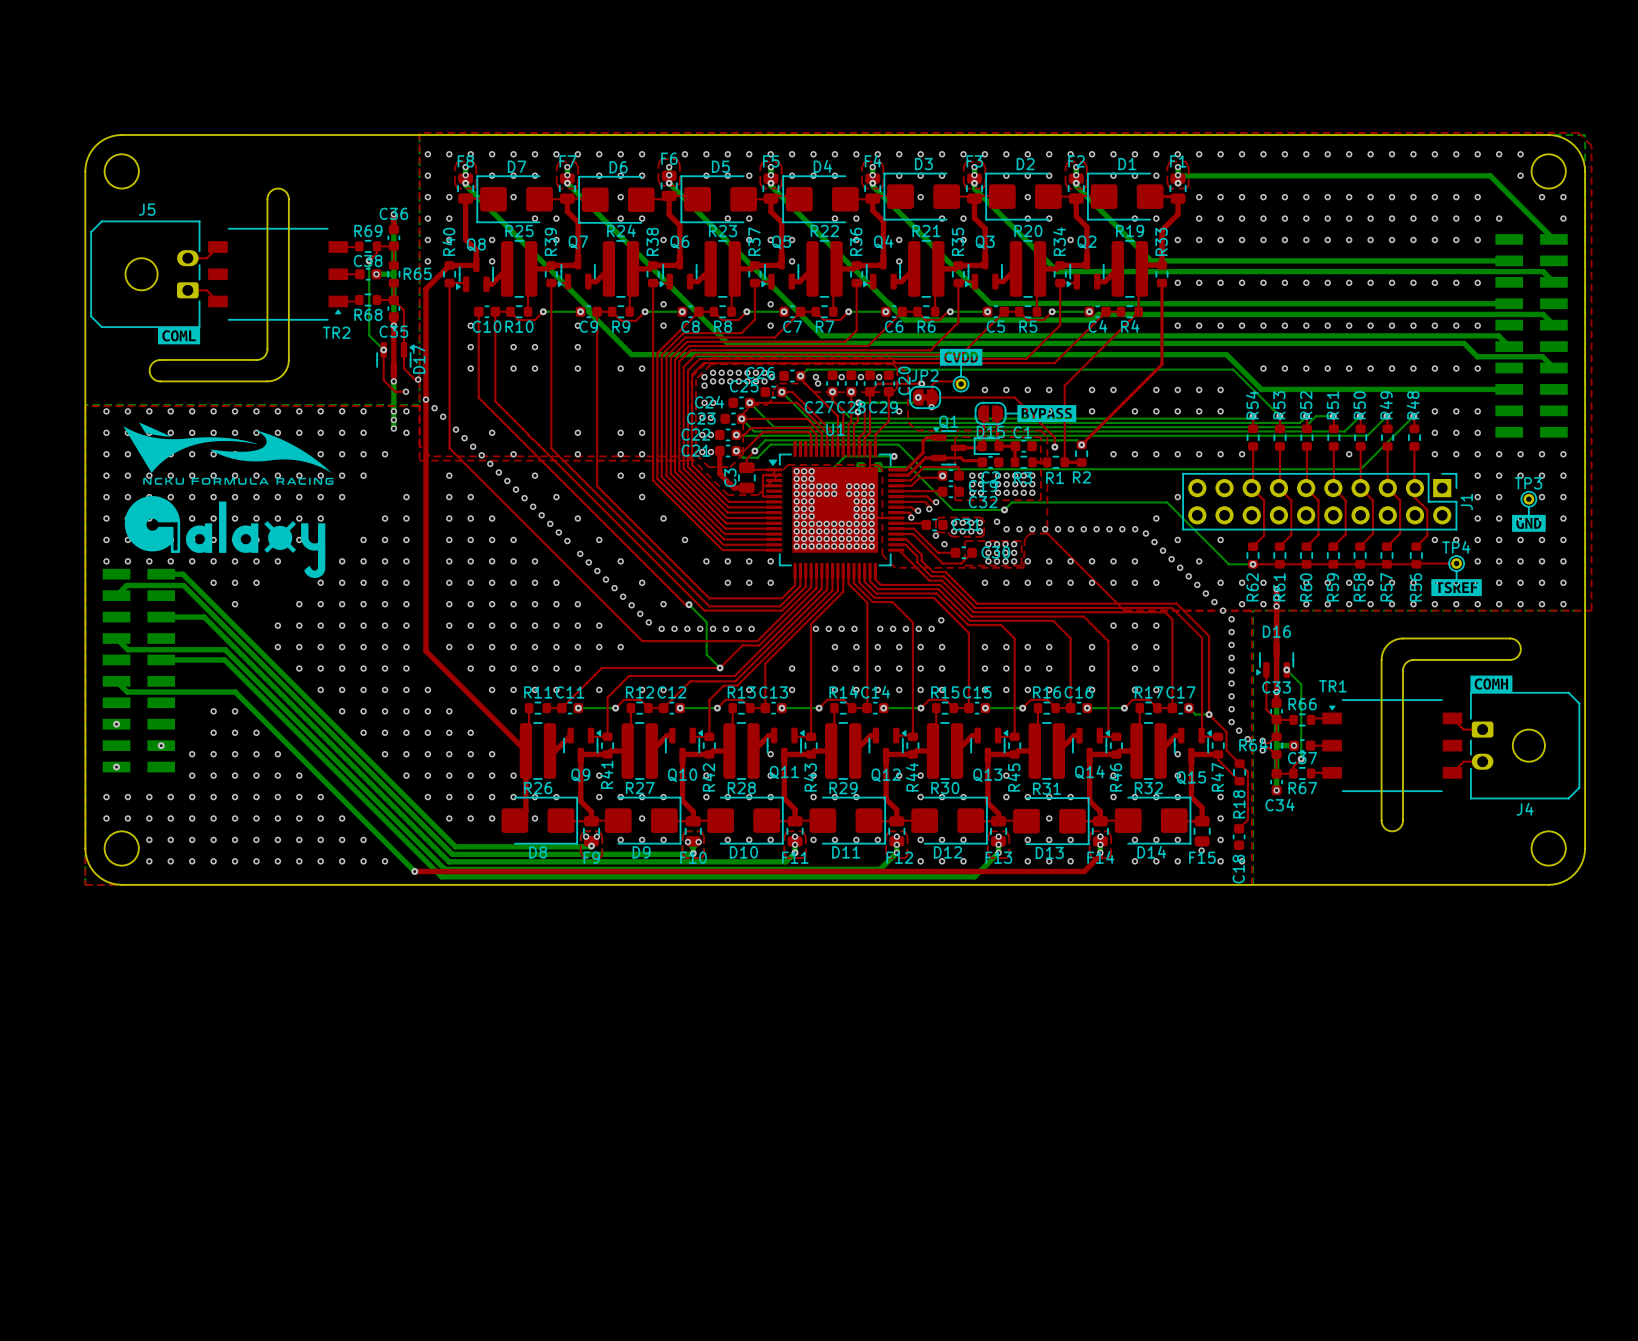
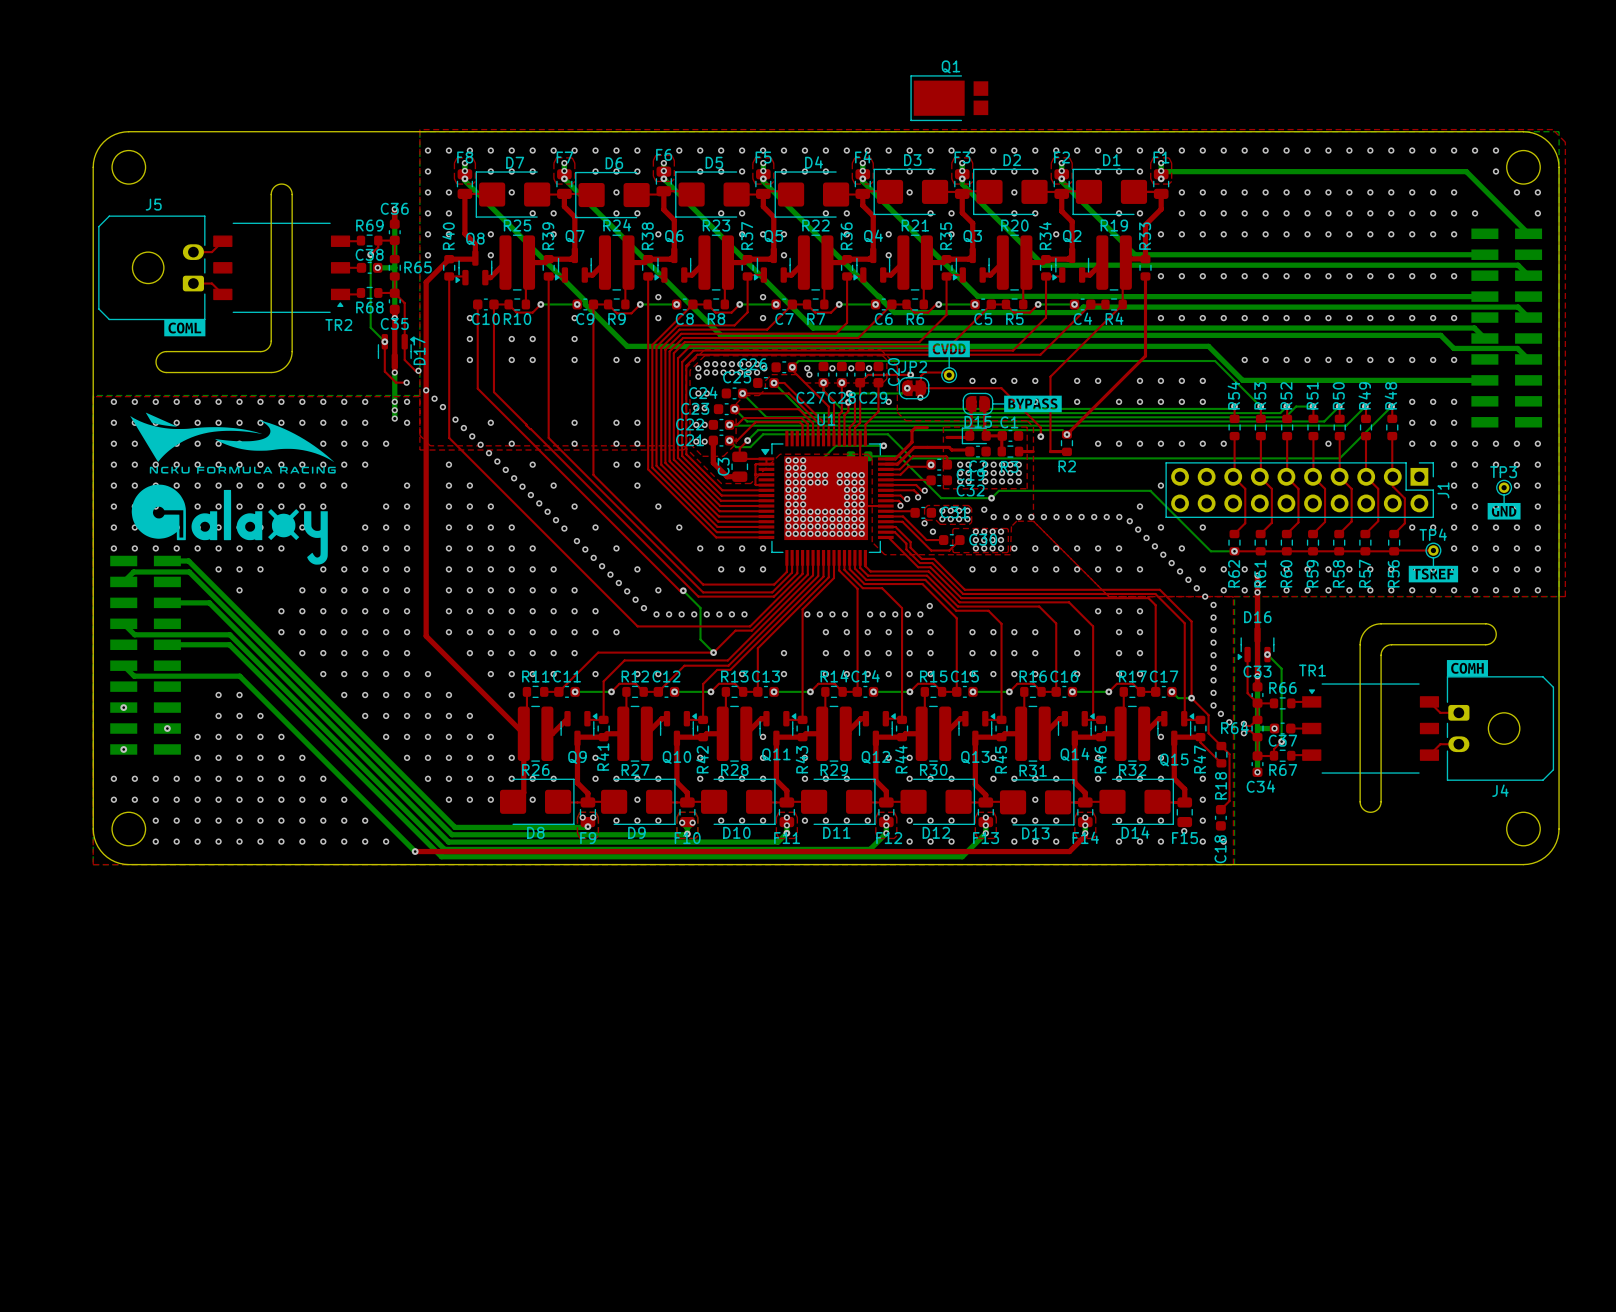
Q1 footprint: [930, 427, 967, 466] -> [910, 75, 989, 122]
R1: (1055, 462) -> none

